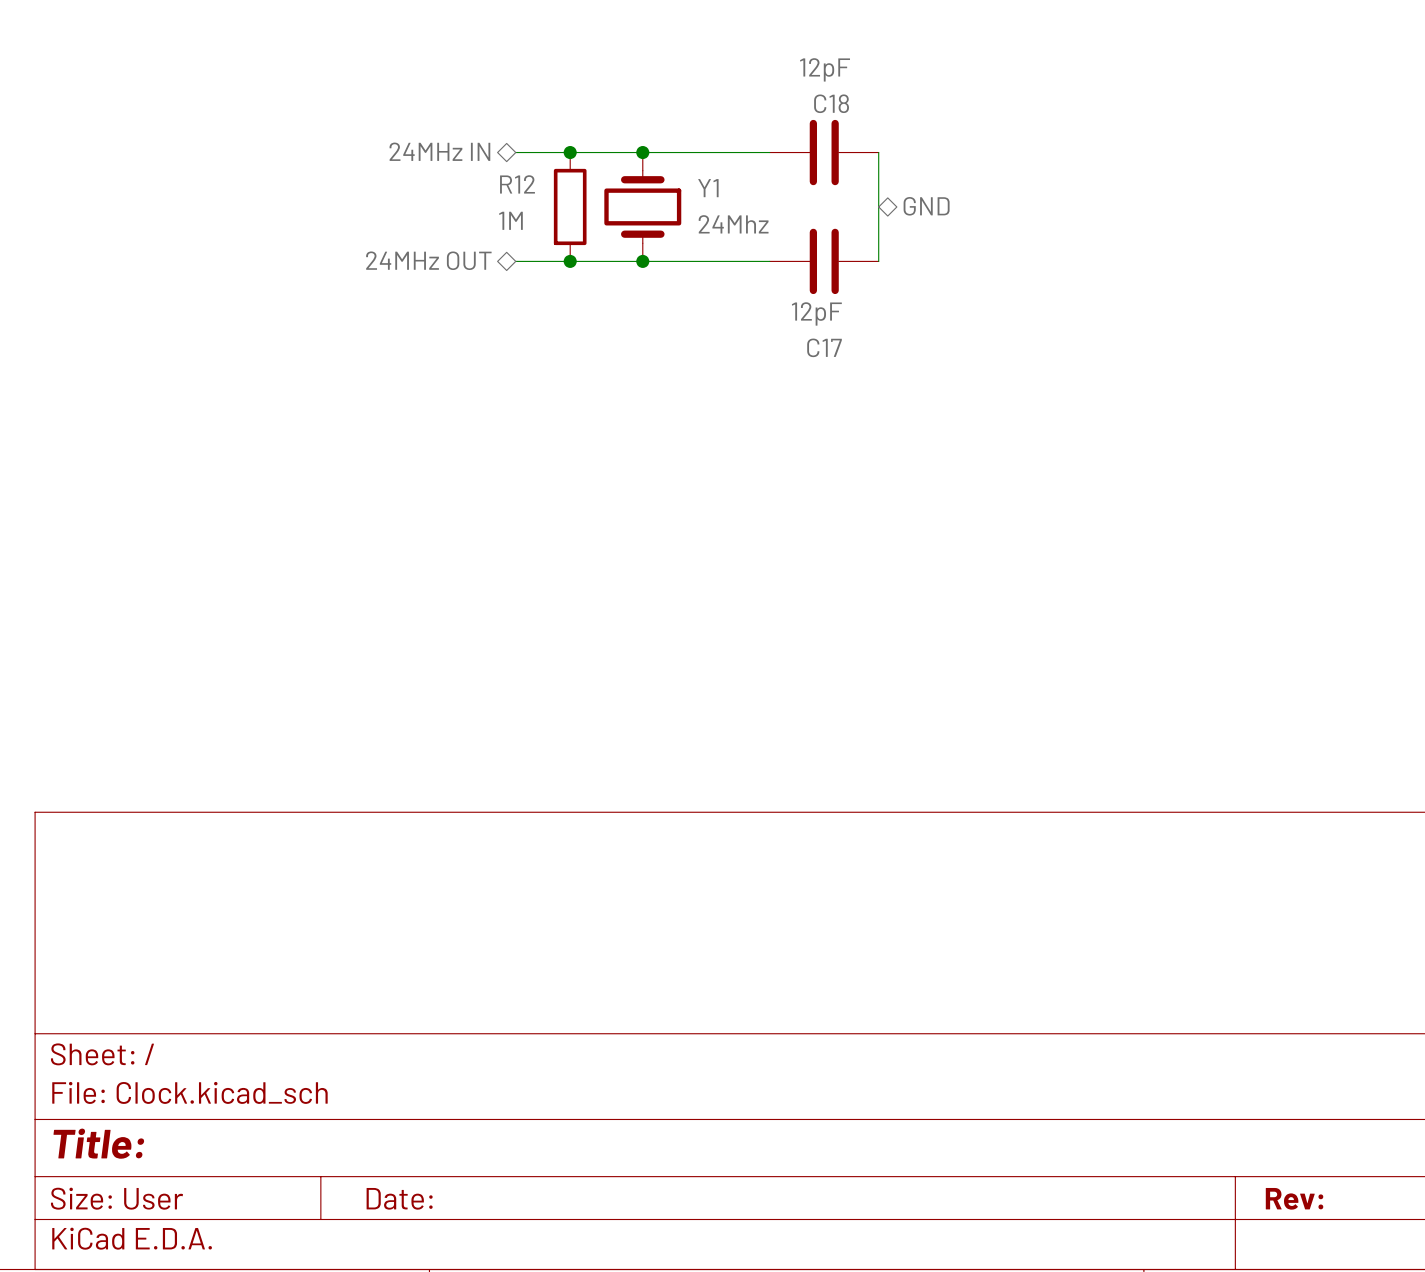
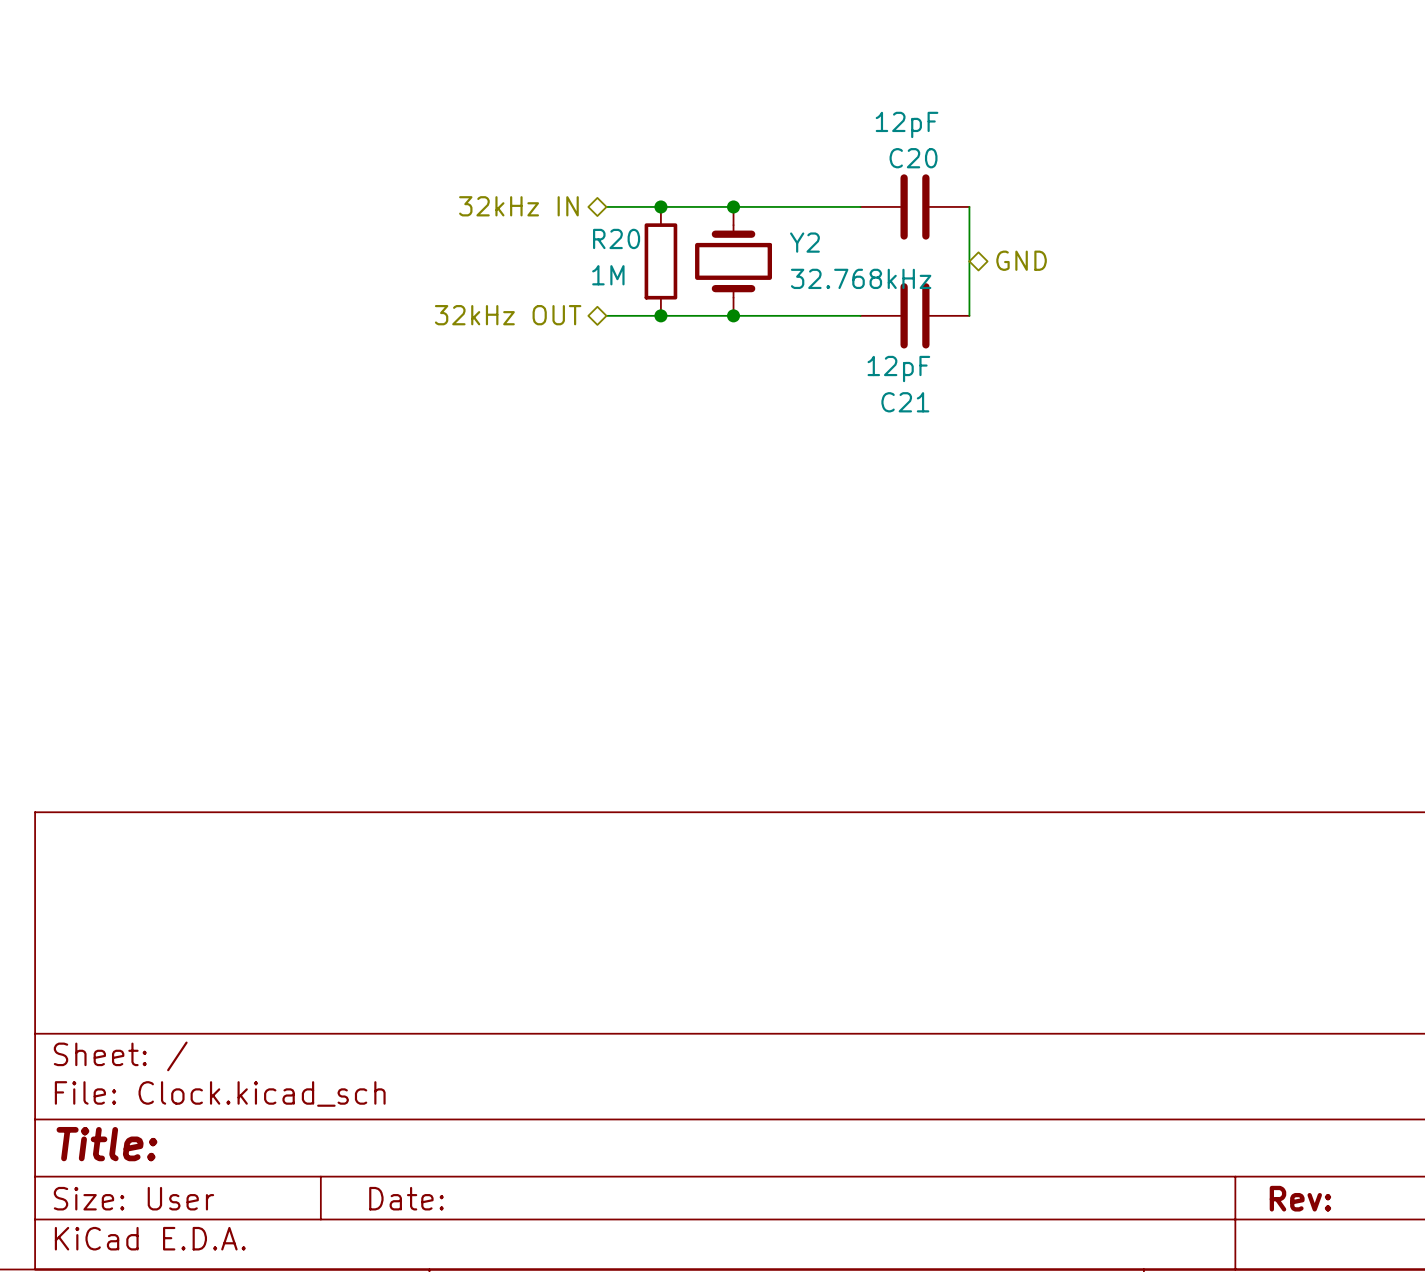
hierarchical label: 24MHz IN (439, 151) -> none
wire: (515, 152) (769, 152) -> (606, 206) (860, 206)
junction: (570, 152) -> none
junction: (642, 152) -> none
C18: 12pF (824, 152) -> none
wire: (878, 152) (878, 261) -> (969, 206) (969, 315)
hierarchical label: none -> 32kHz IN (518, 206)
R12: 1M (570, 206) -> none
Y1: 24Mhz (642, 206) -> none
junction: none -> (660, 206)
junction: none -> (733, 206)
C20: none -> 12pF (914, 206)
hierarchical label position: GND (926, 206) -> GND (1021, 260)
hierarchical label: 24MHz OUT (428, 260) -> none
wire: (515, 261) (769, 261) -> (606, 315) (860, 315)
junction: (570, 261) -> none
junction: (642, 261) -> none
R20: none -> 1M (660, 261)
Y2: none -> 32.768kHz (733, 261)
C17: 12pF (824, 261) -> none
hierarchical label: none -> 32kHz OUT (508, 315)
junction: none -> (660, 315)
junction: none -> (733, 315)
C21: none -> 12pF (914, 315)

